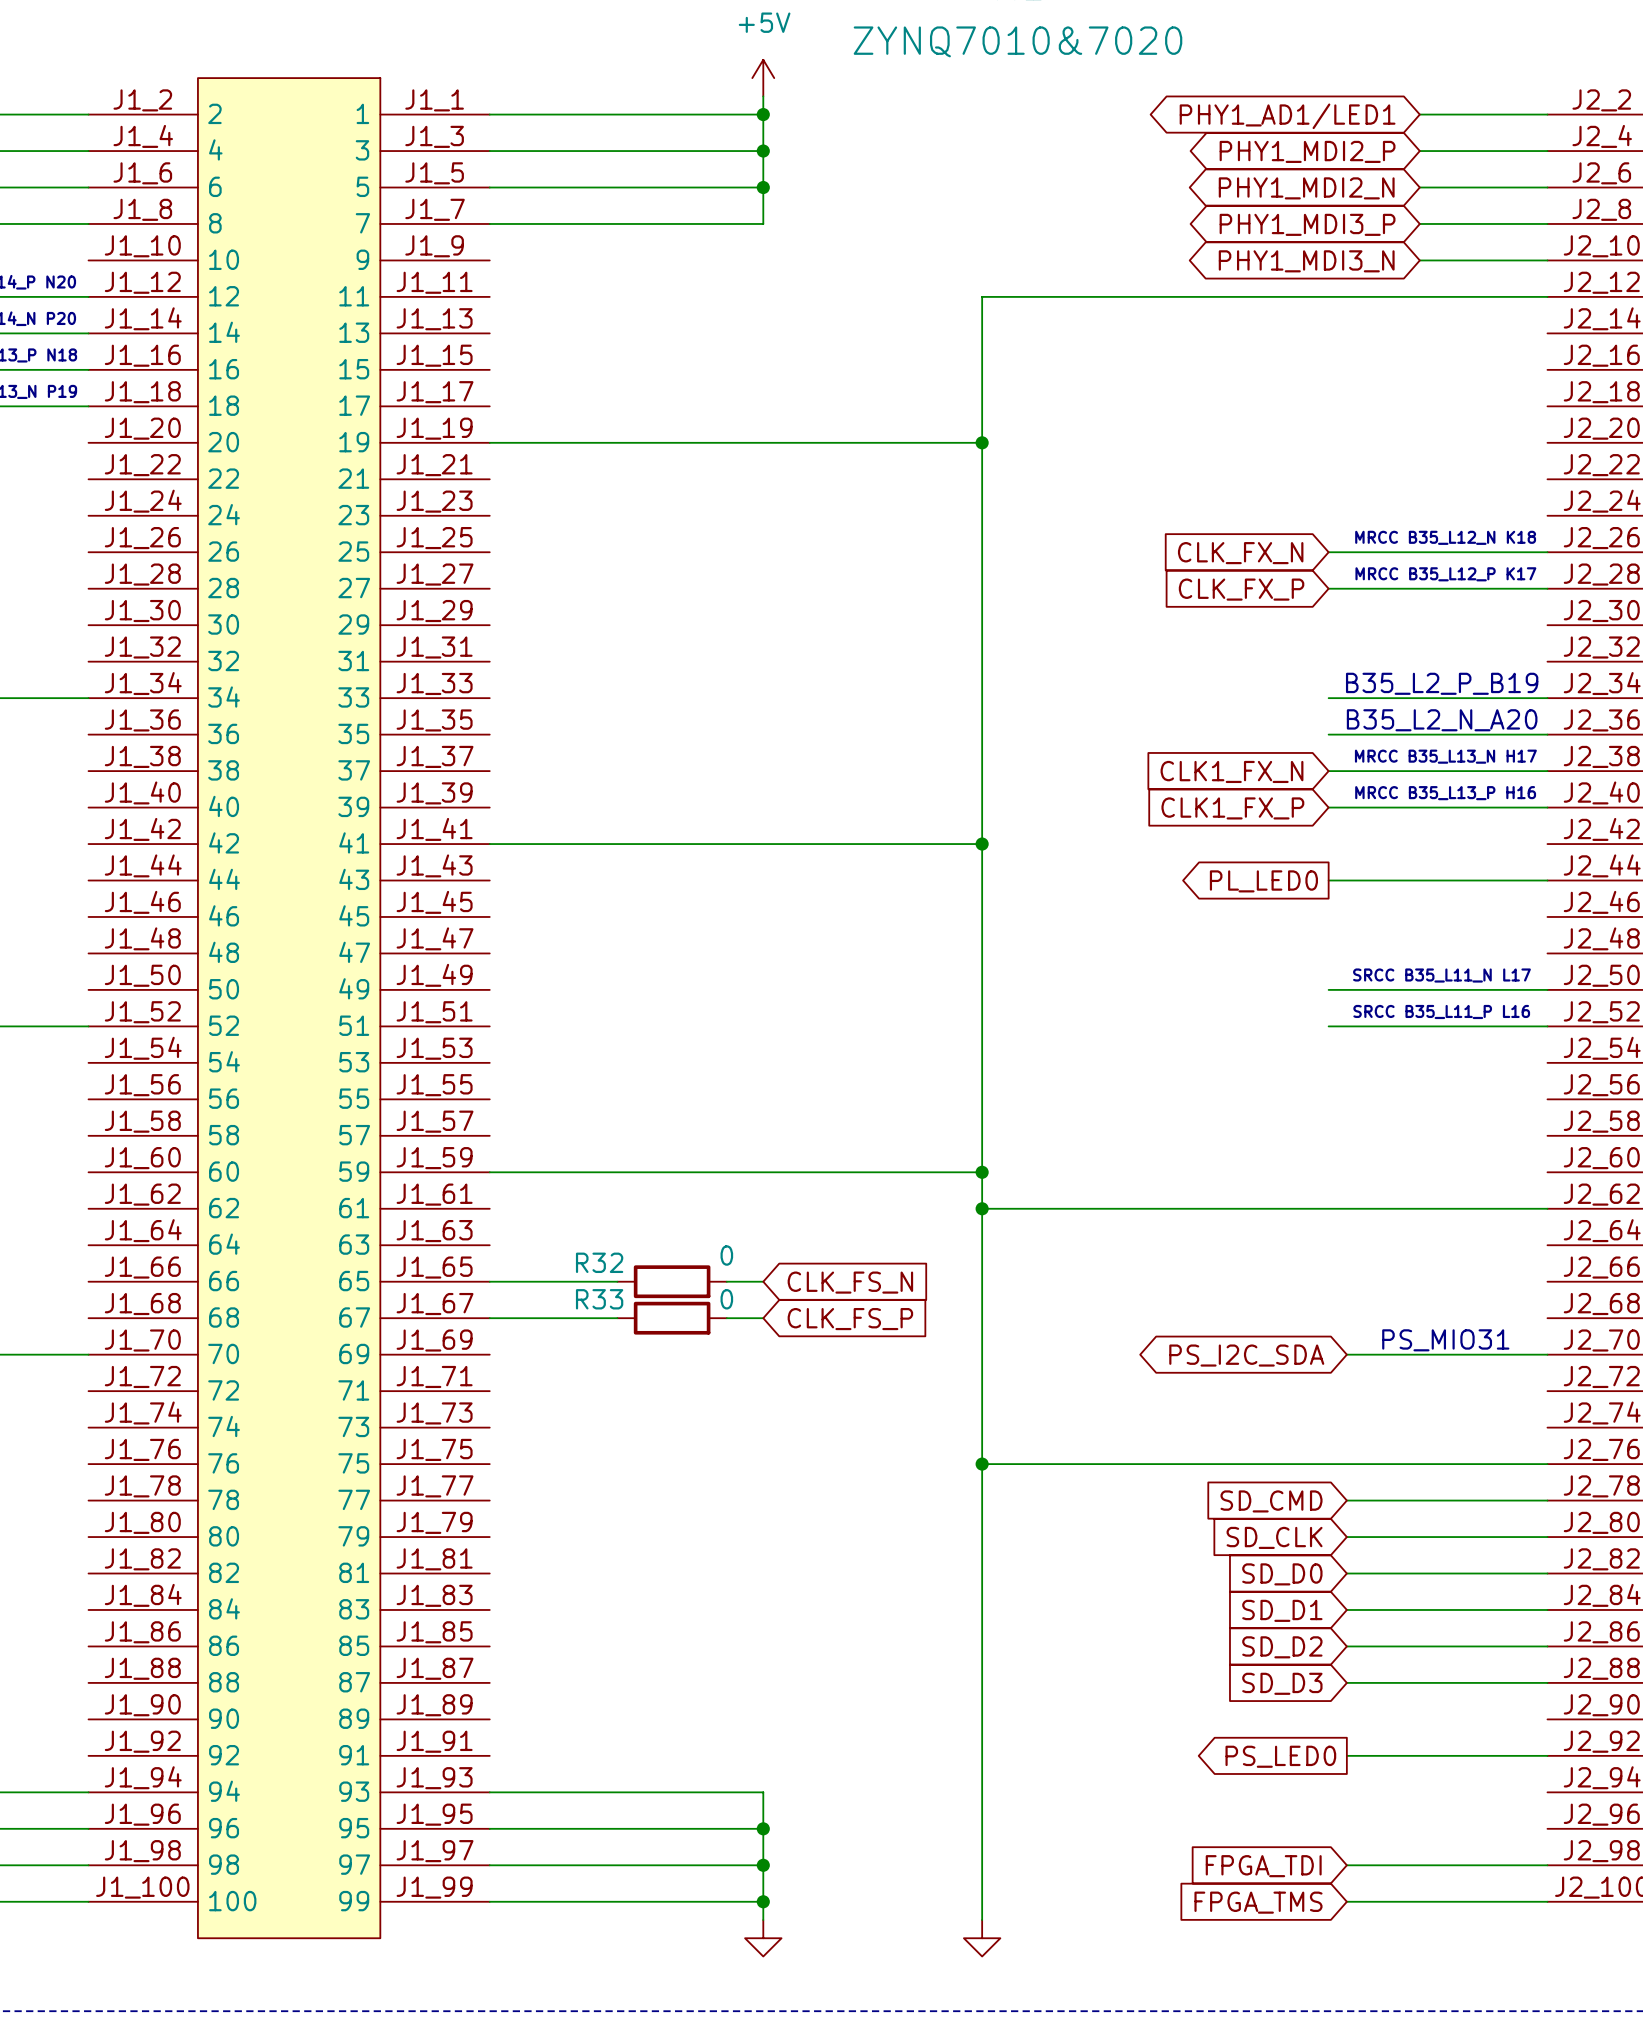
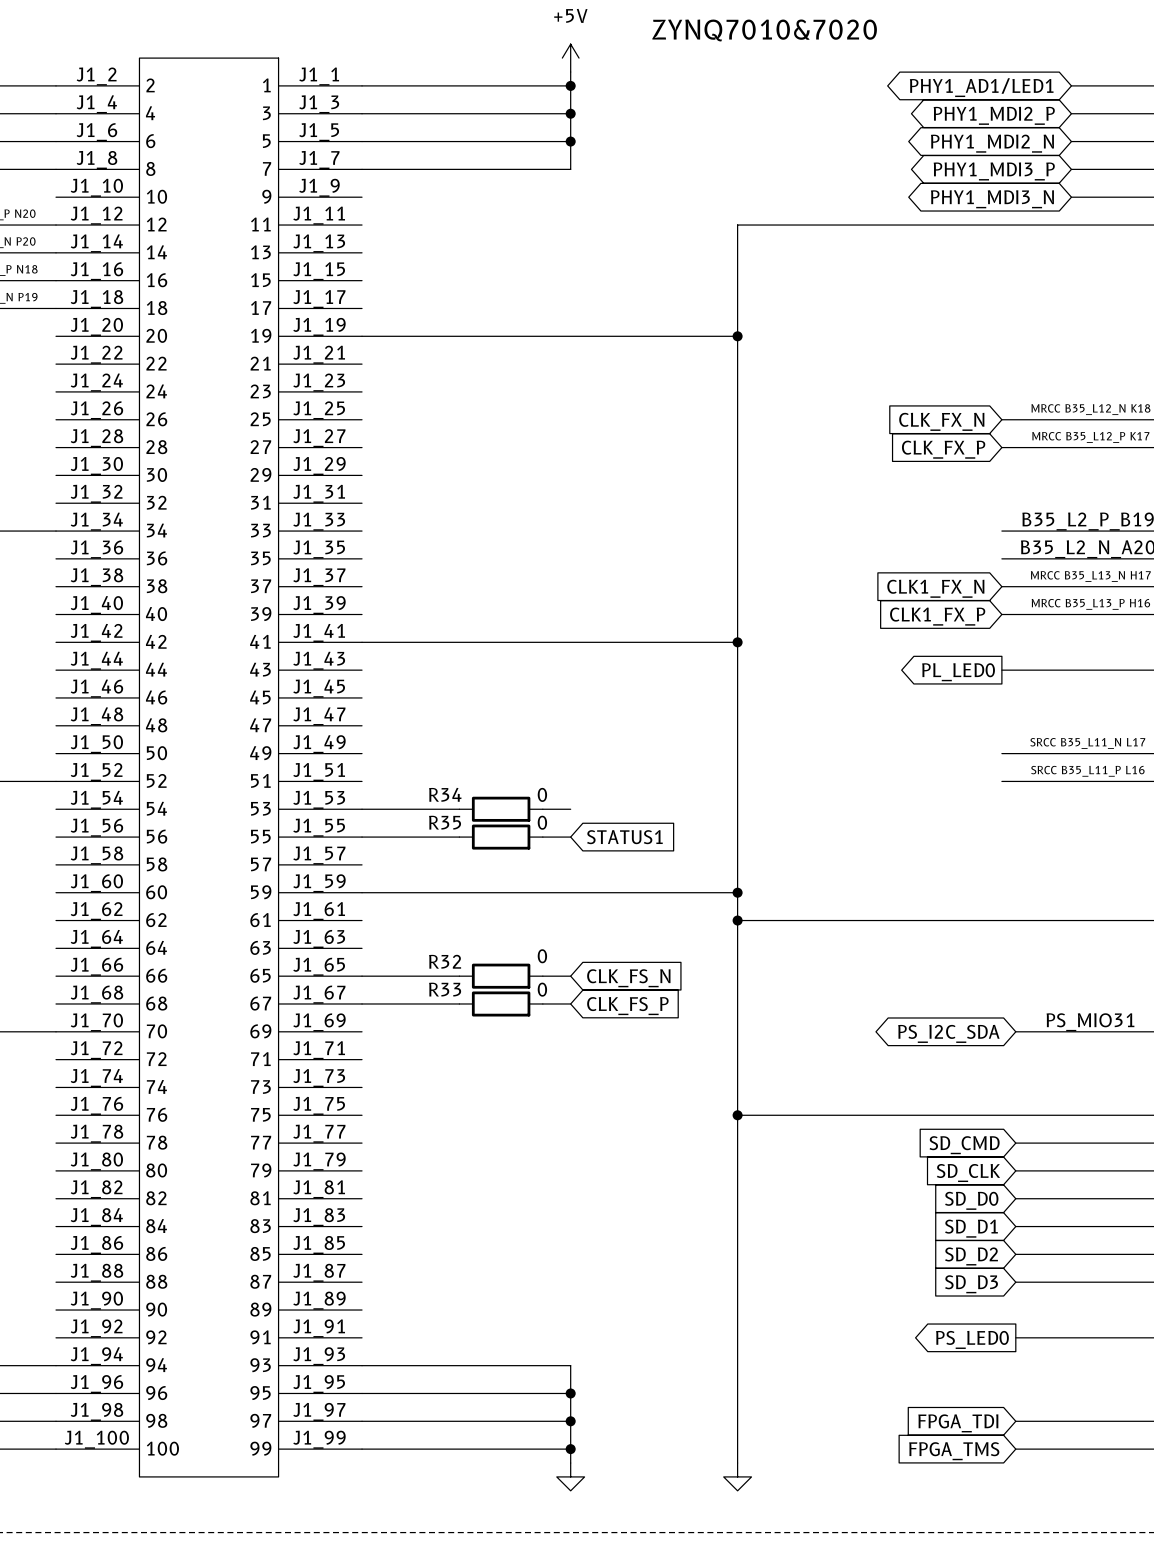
wire: none -> (362, 809) (459, 809)
R34: none -> 0 (501, 809)
wire: none -> (542, 809) (570, 809)
wire: none -> (362, 837) (459, 837)
R35: none -> 0 (501, 837)
wire: none -> (542, 837) (570, 837)
global label: none -> STATUS1 (624, 837)

